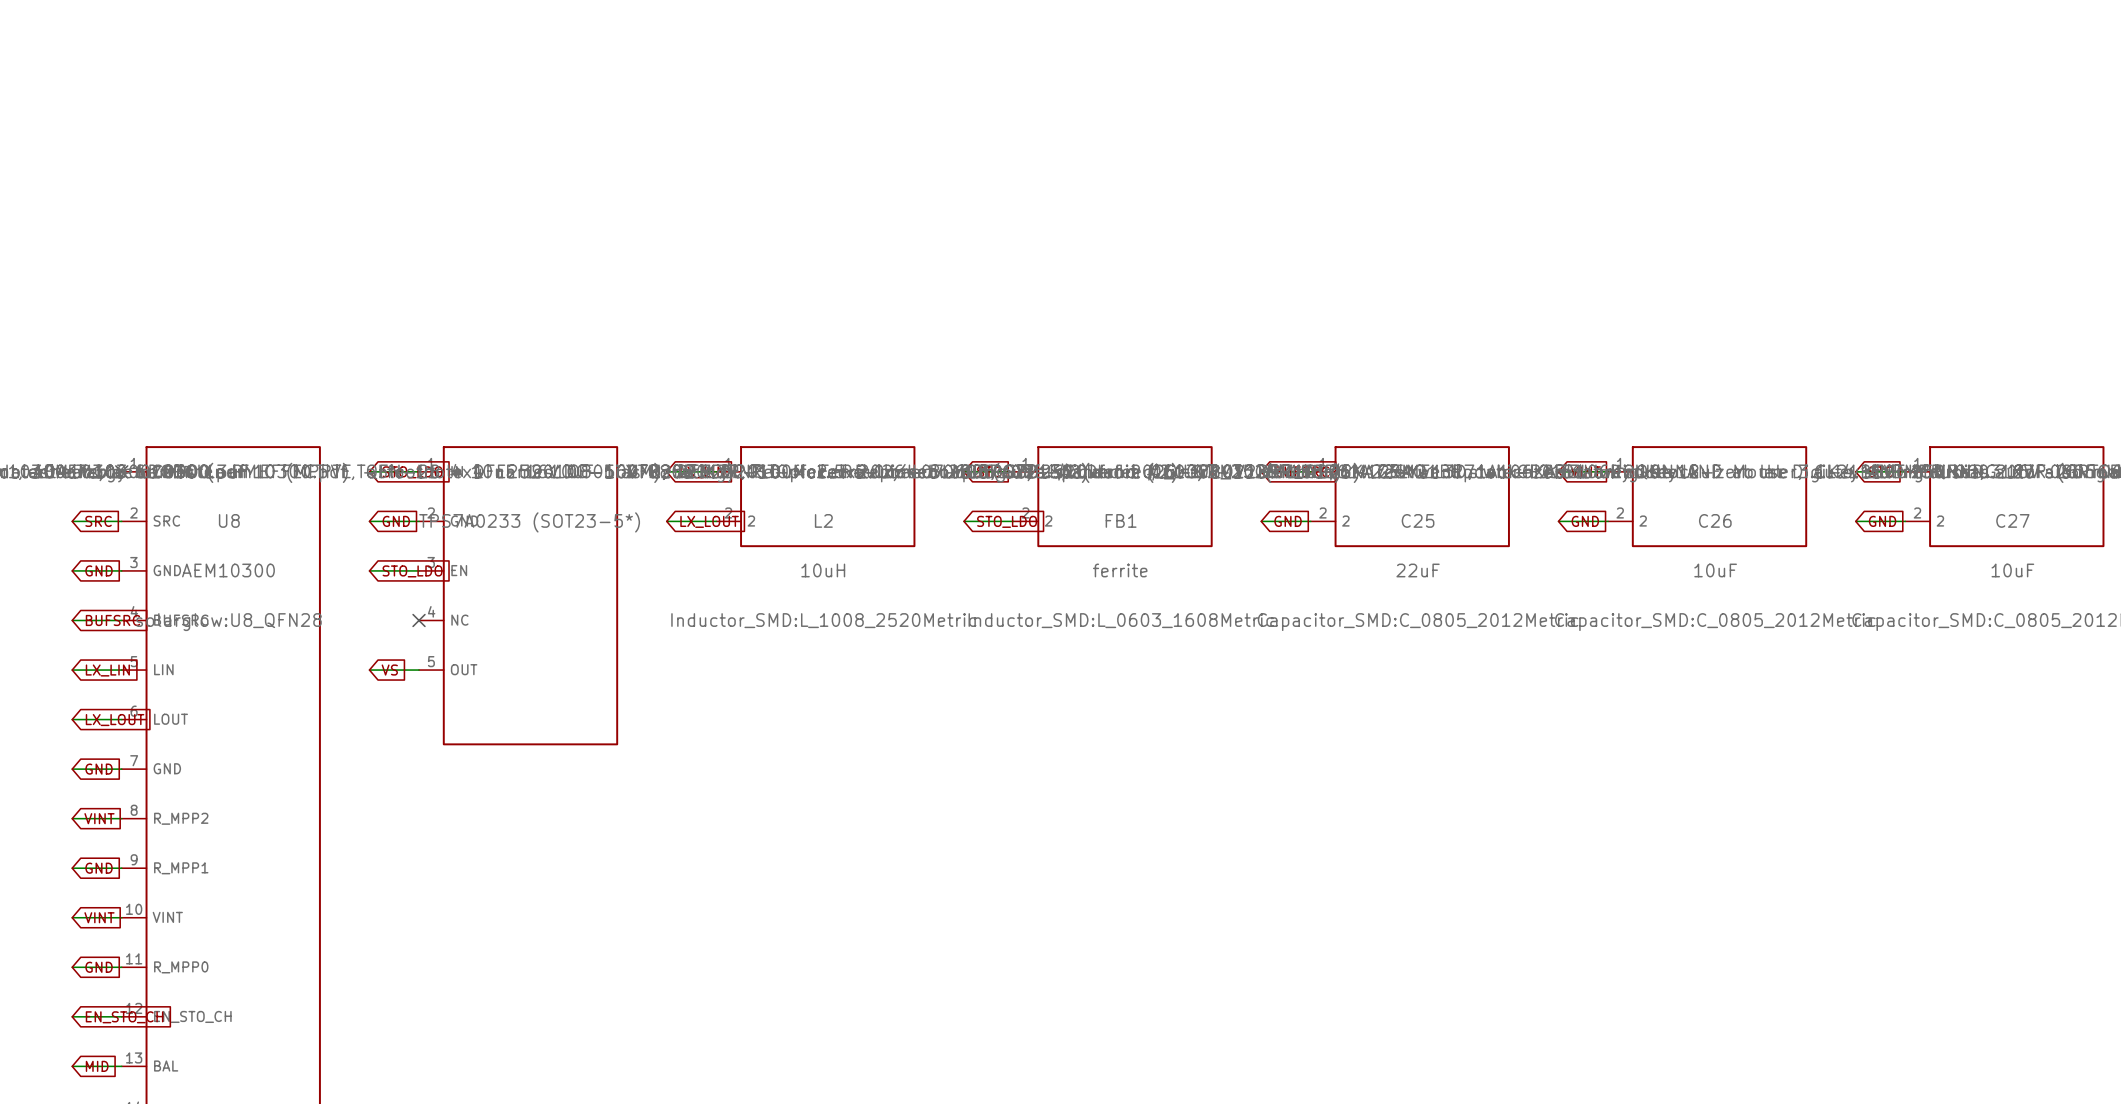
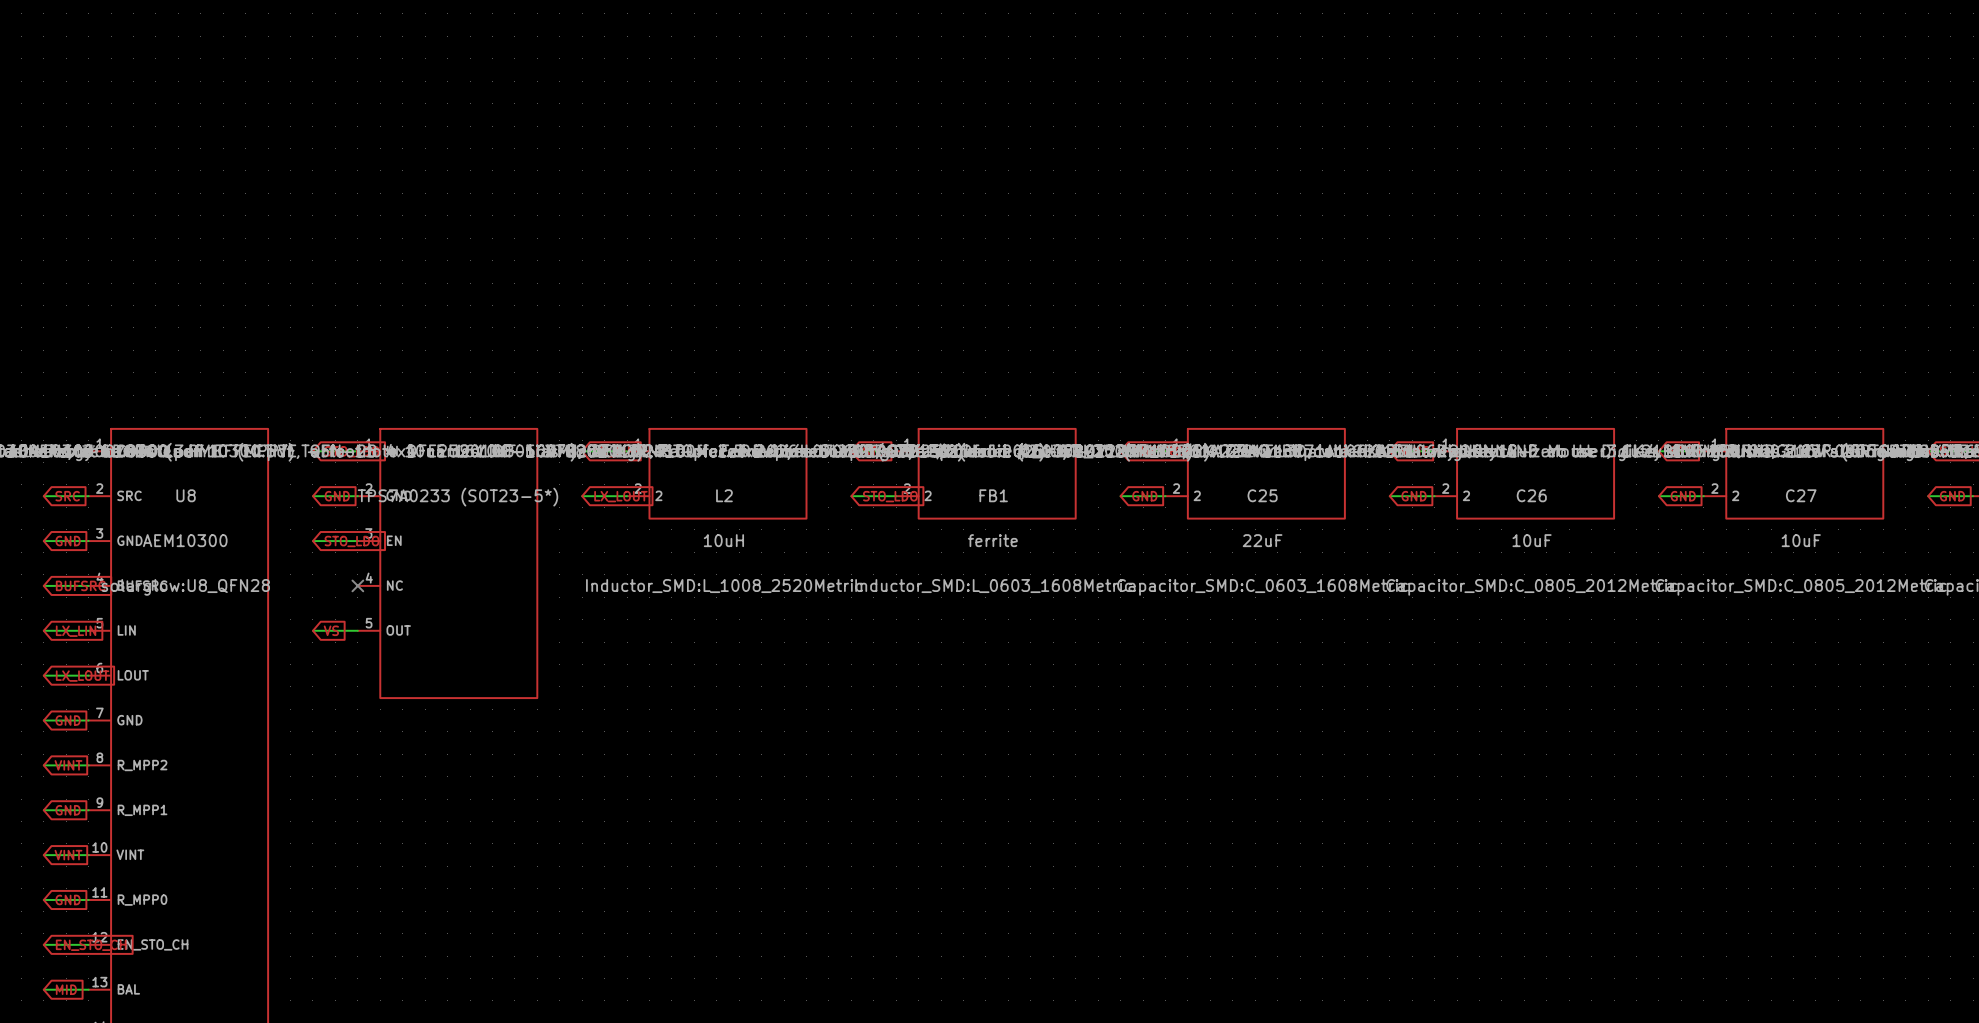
C25 text: Capacitor_SMD:C_0805_2012Metric (1418, 622) -> Capacitor_SMD:C_0603_1608Metric (1262, 587)

